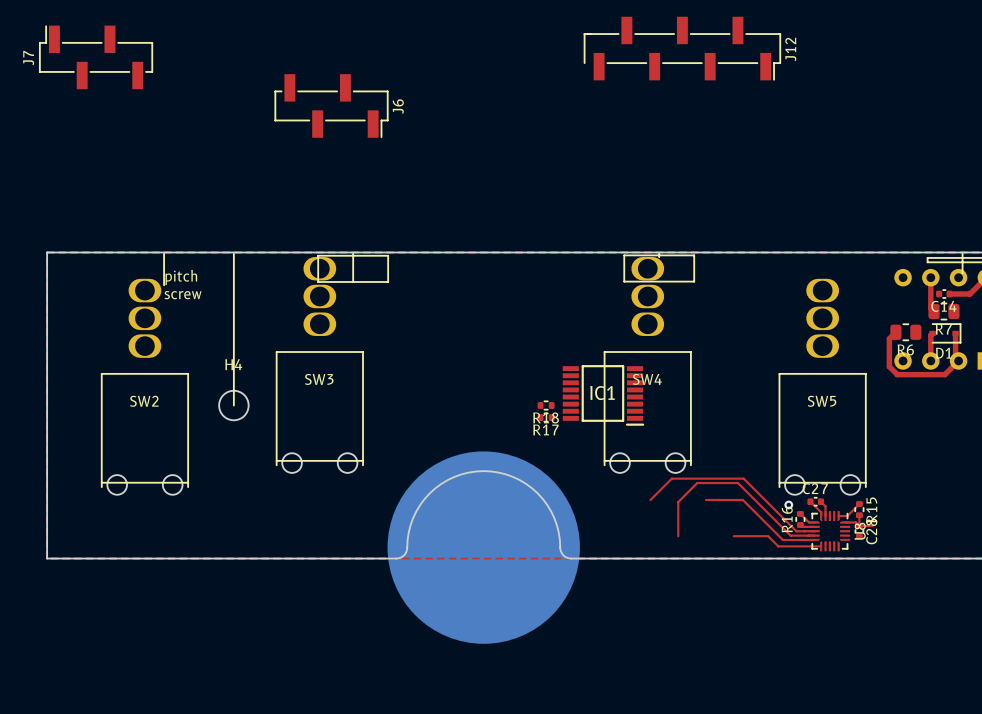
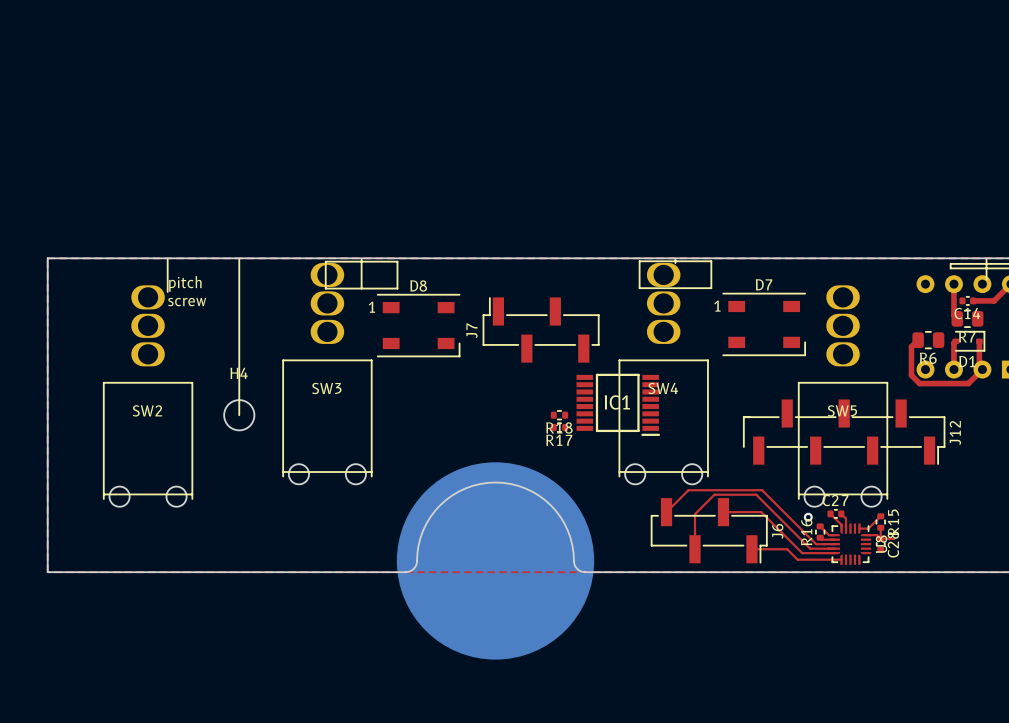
J12 position: (682, 48) -> (844, 432)
J7 position: (96, 57) -> (541, 330)
J6 position: (331, 105) -> (709, 530)
D7: none -> (764, 324)
D8: none -> (418, 325)

